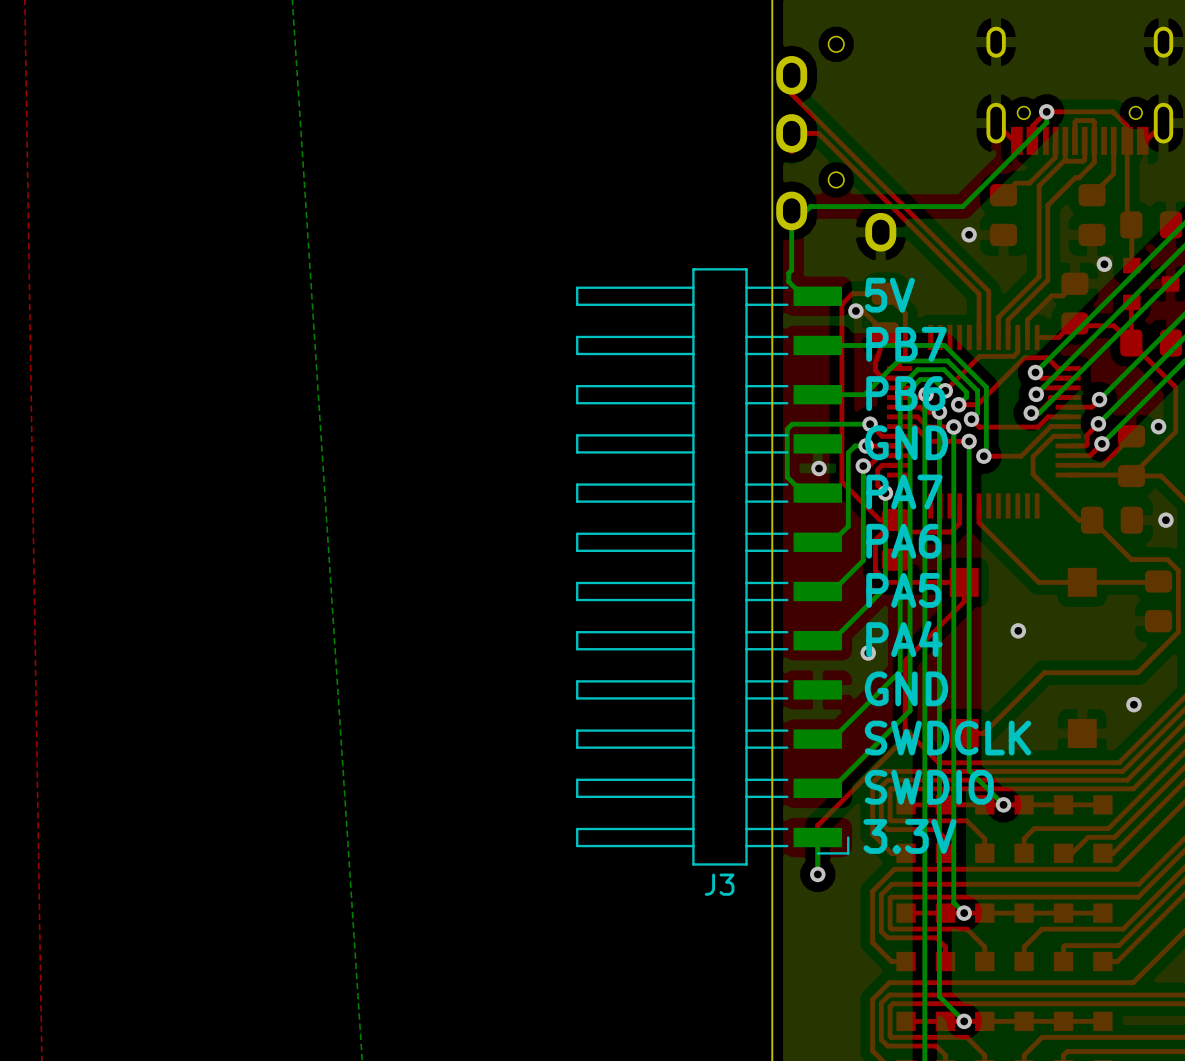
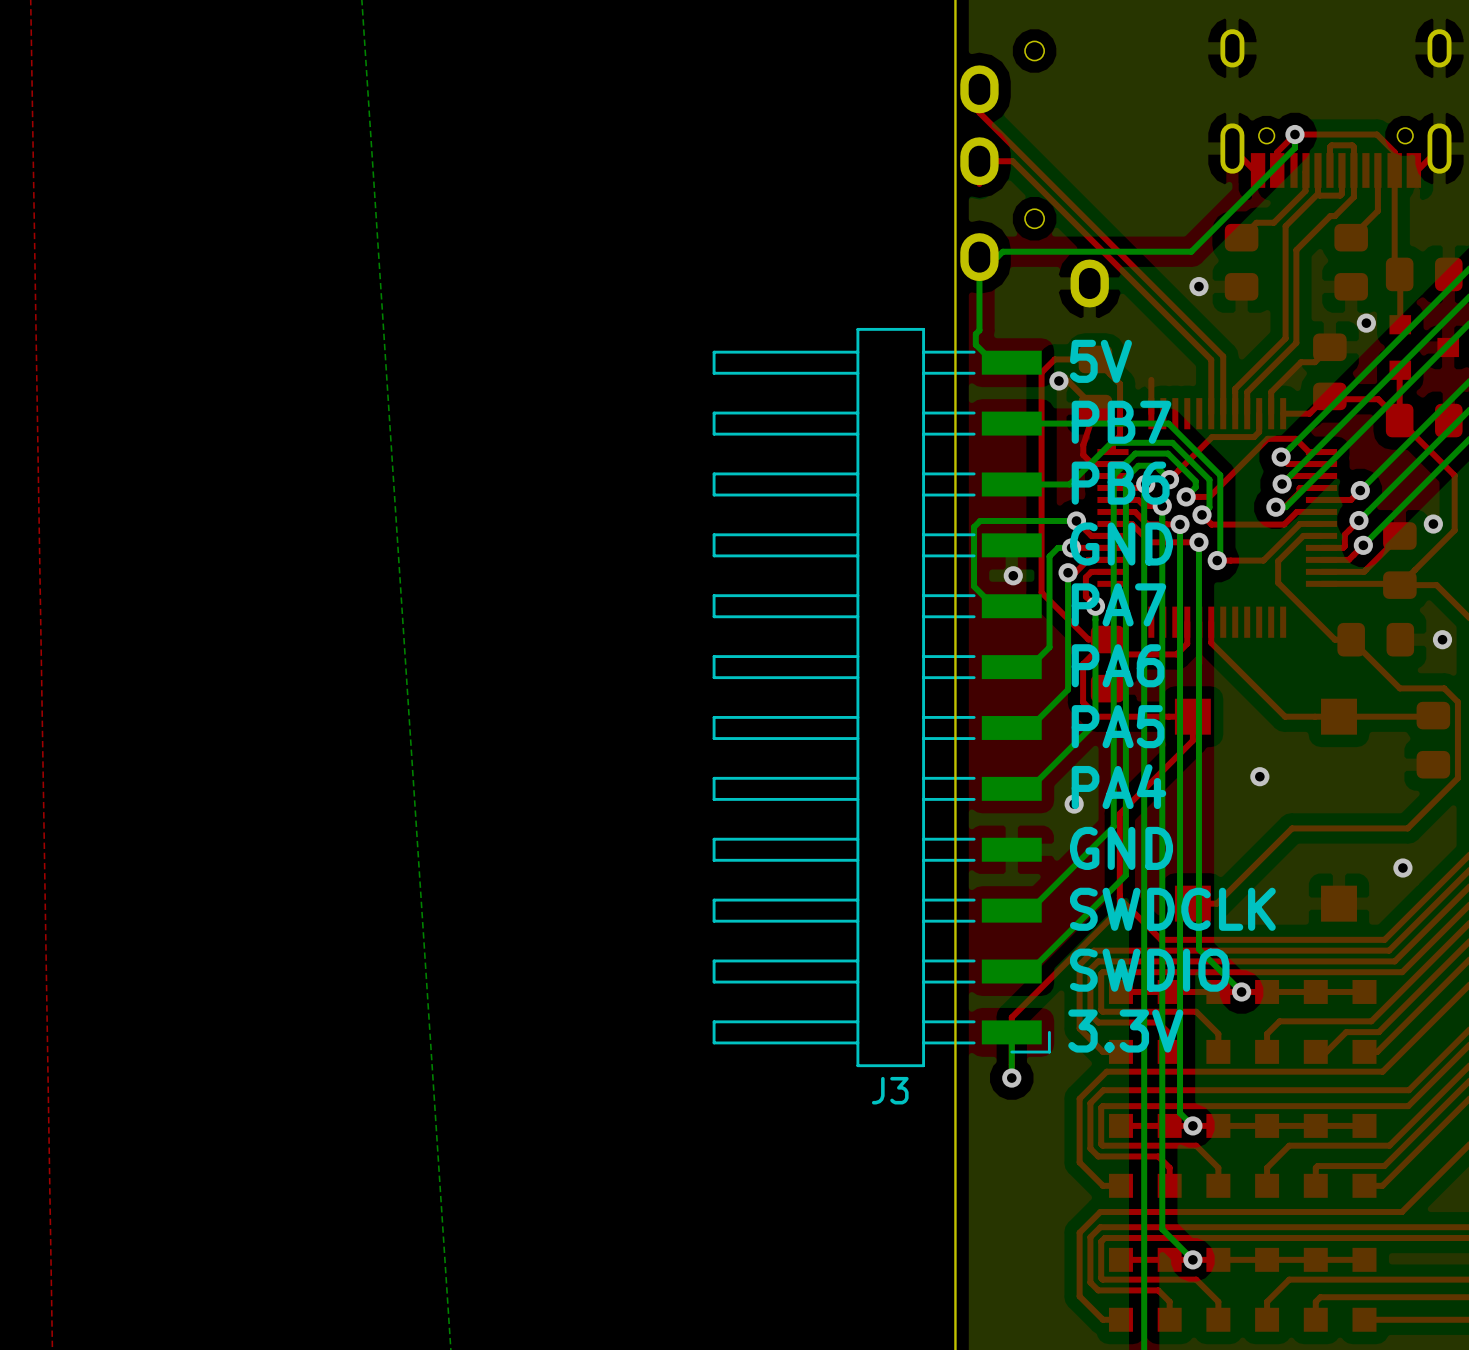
top track: none -> (1151, 379) (1151, 413)

